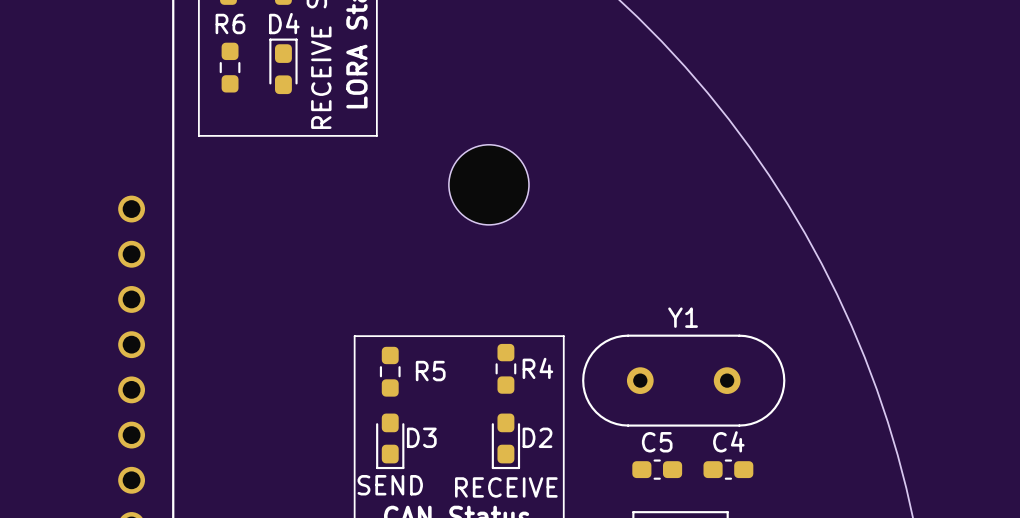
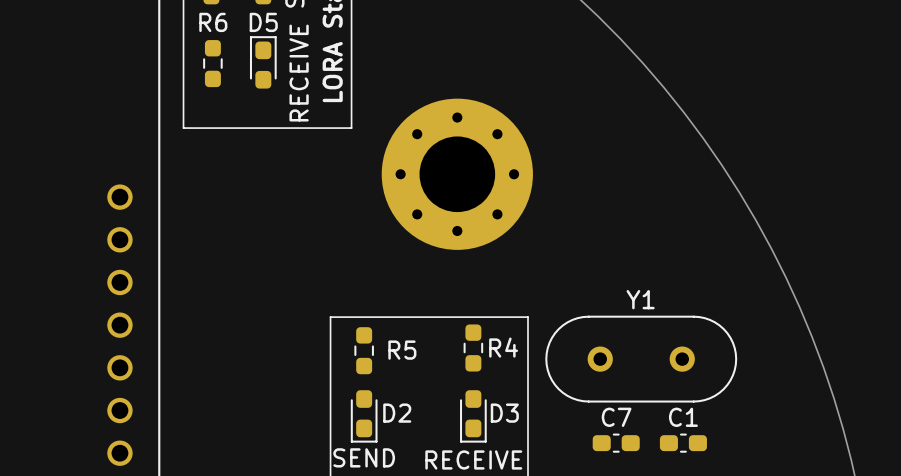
D4 name: D4 (284, 23) -> D5 (263, 22)
part footprint: [448, 144, 529, 225] -> [381, 98, 533, 250]
D3 name: D3 (421, 437) -> D2 (397, 413)
D2 name: D2 (537, 437) -> D3 (504, 413)
C4 name: C4 (728, 441) -> C1 (683, 417)
C5 name: C5 (657, 442) -> C7 (616, 417)

